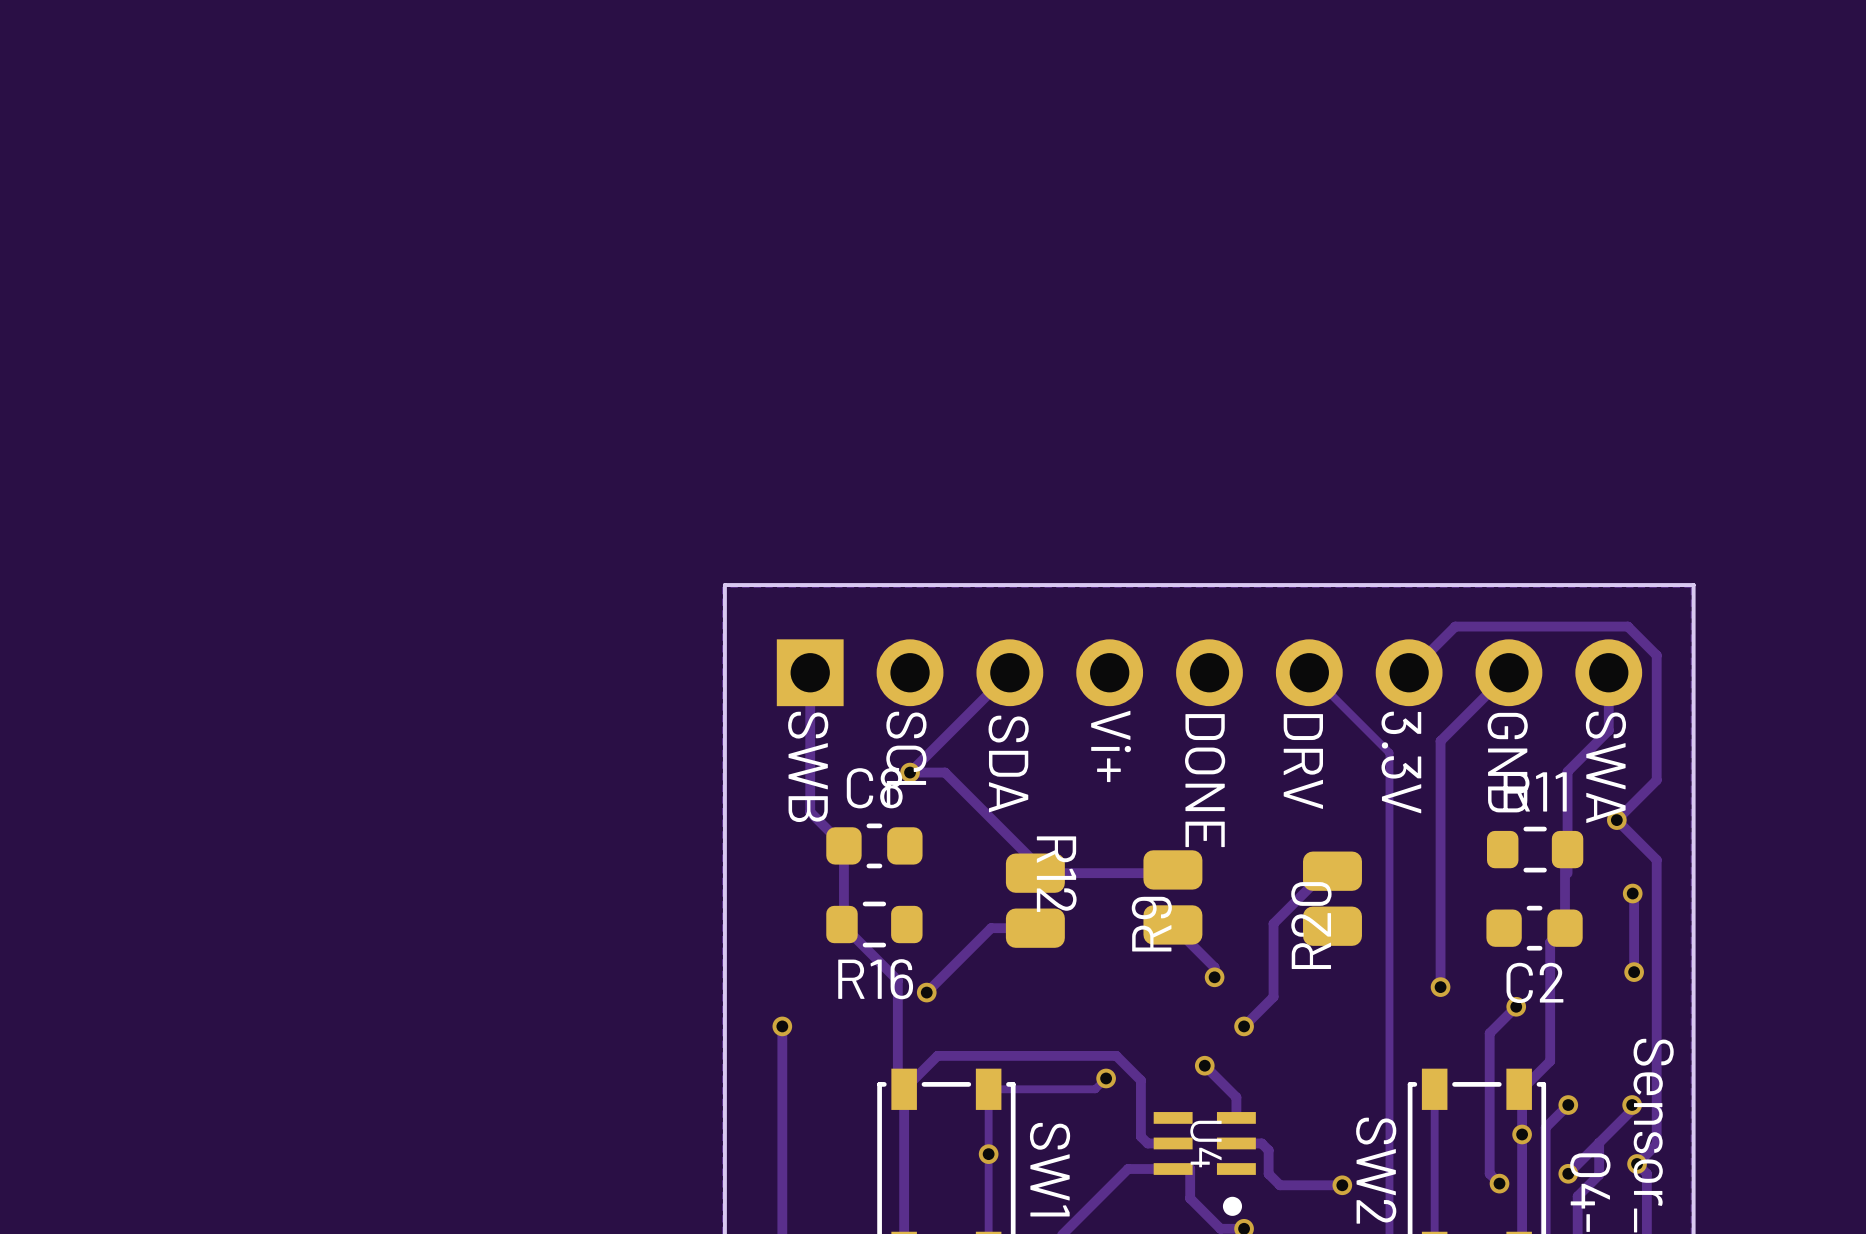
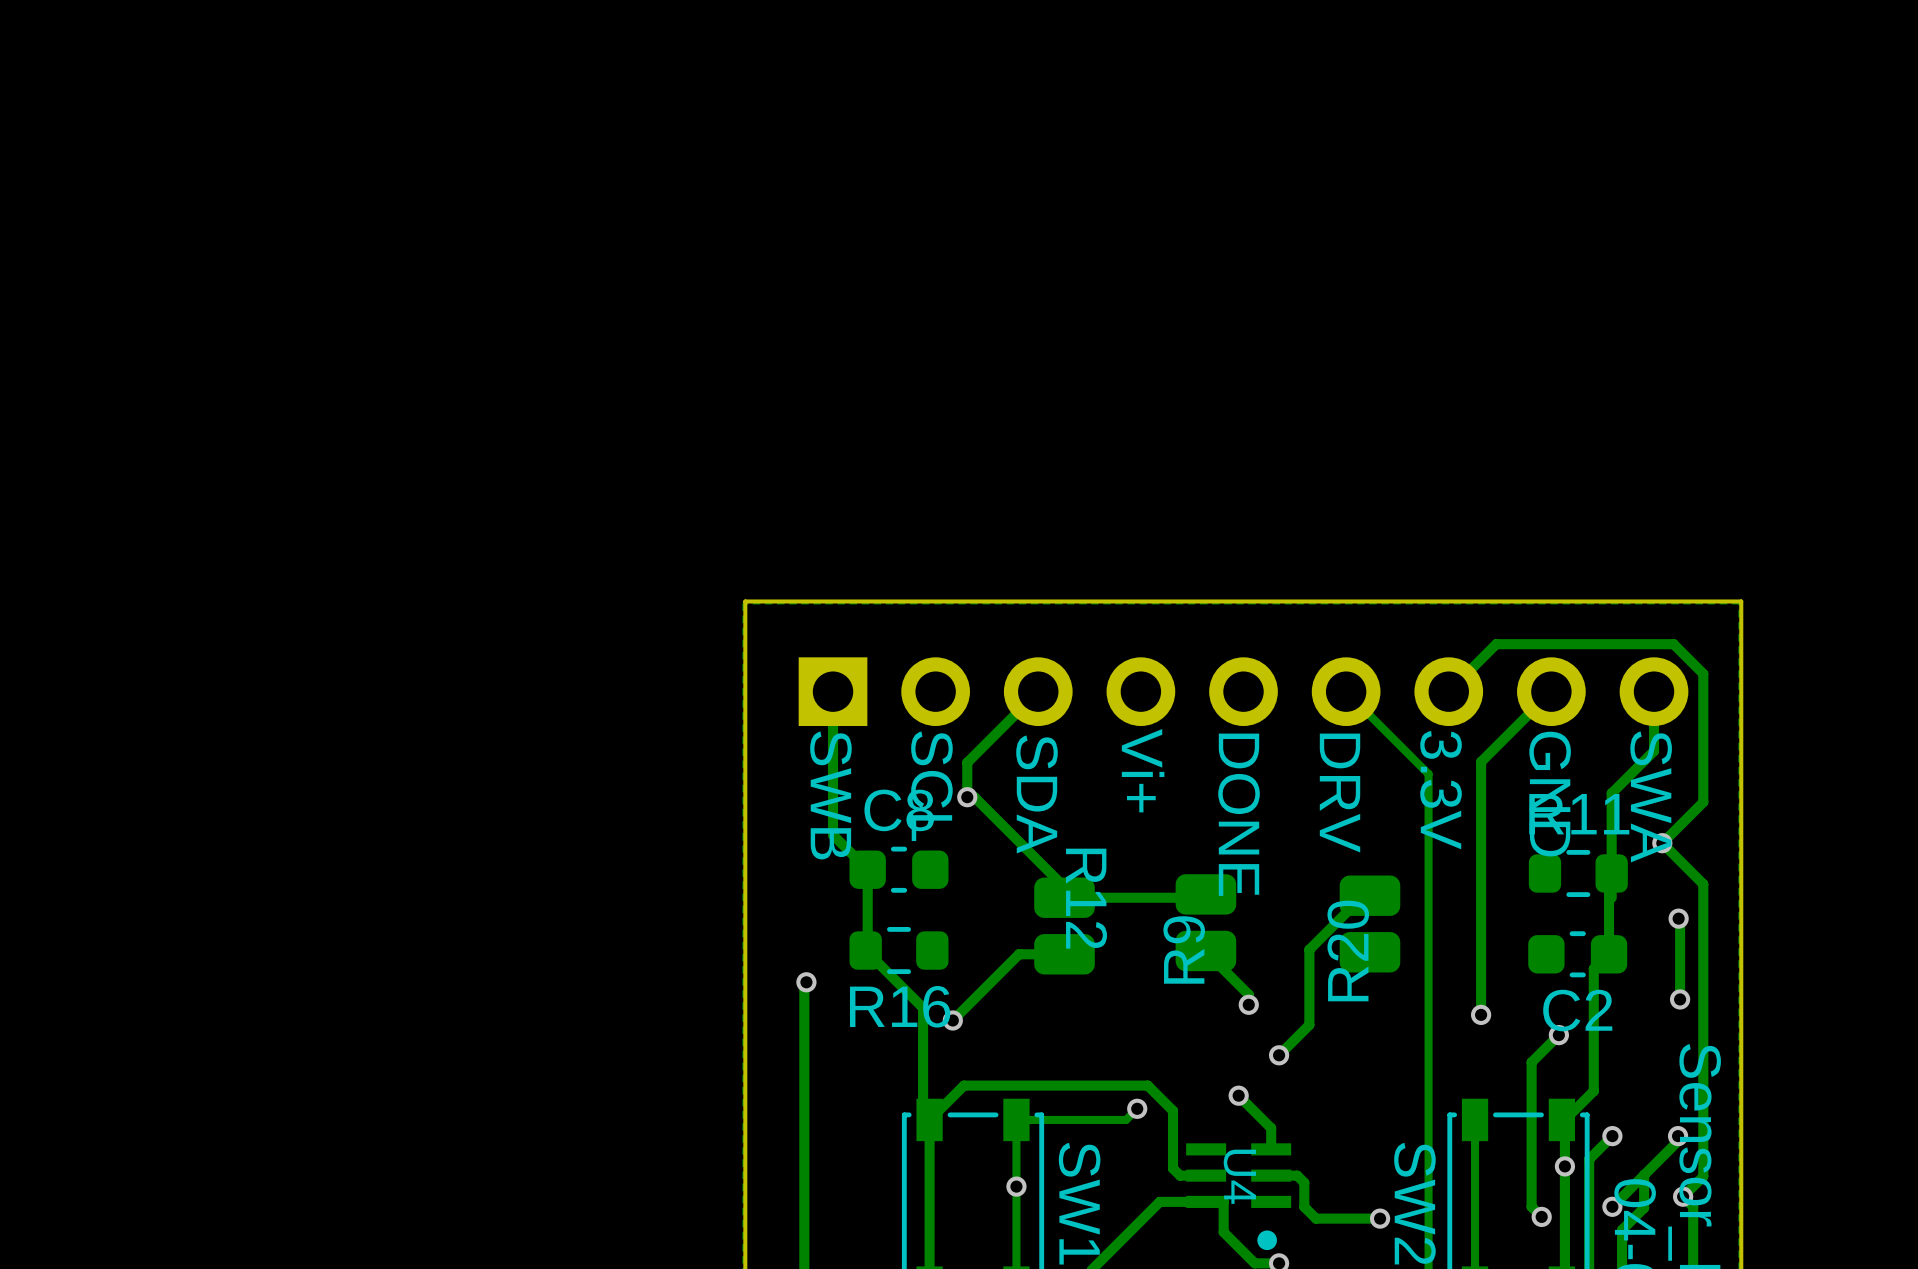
track: (940, 741) (910, 772) (945, 772) (947, 775) -> (967, 762) (967, 797) (974, 797)
via position: (910, 772) -> (967, 797)
track: none -> (806, 982) (804, 984) (804, 1055)
via position: (782, 1026) -> (806, 982)

